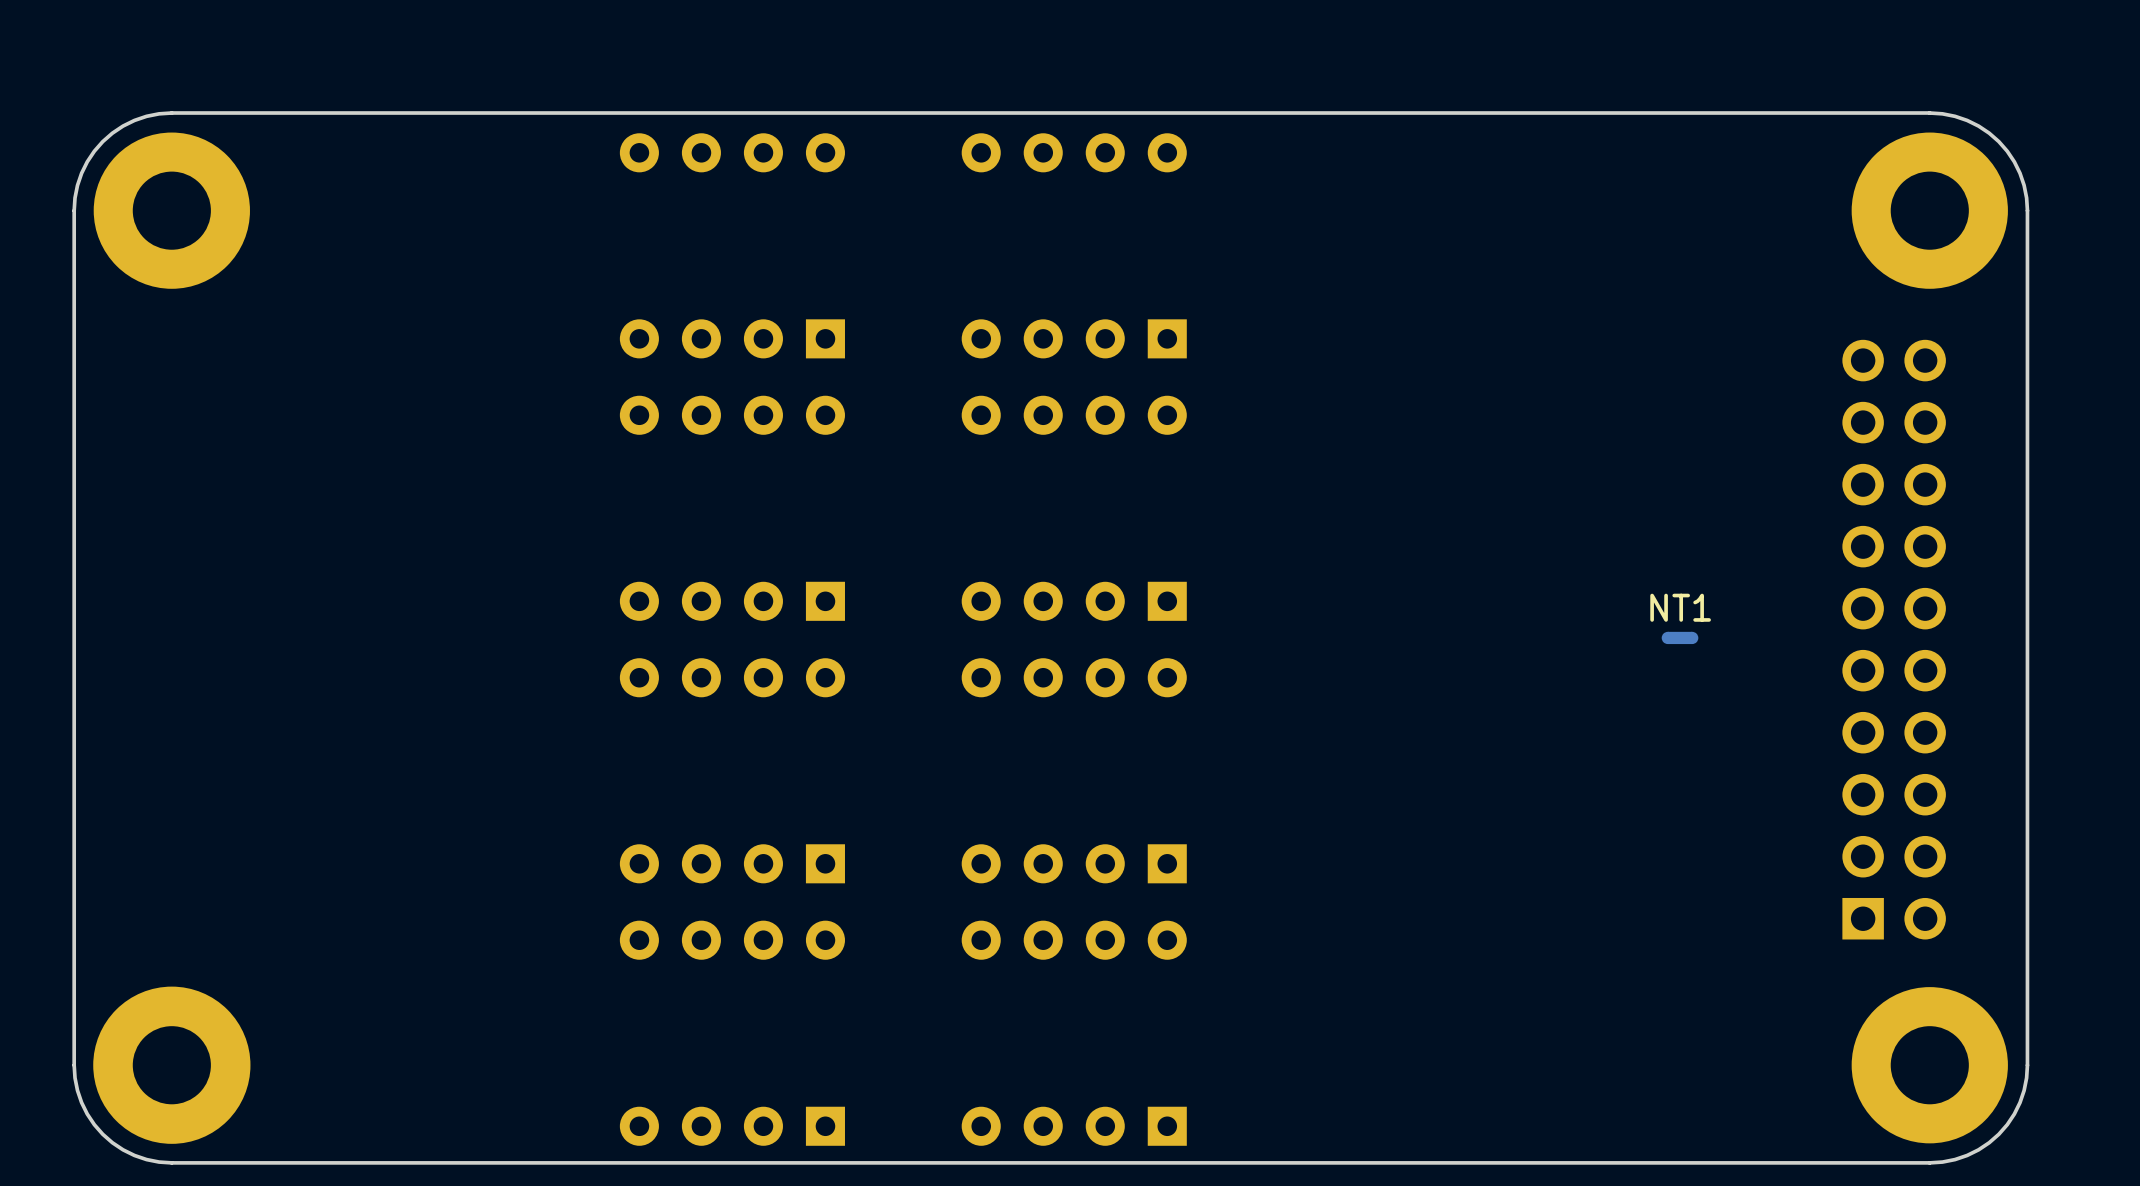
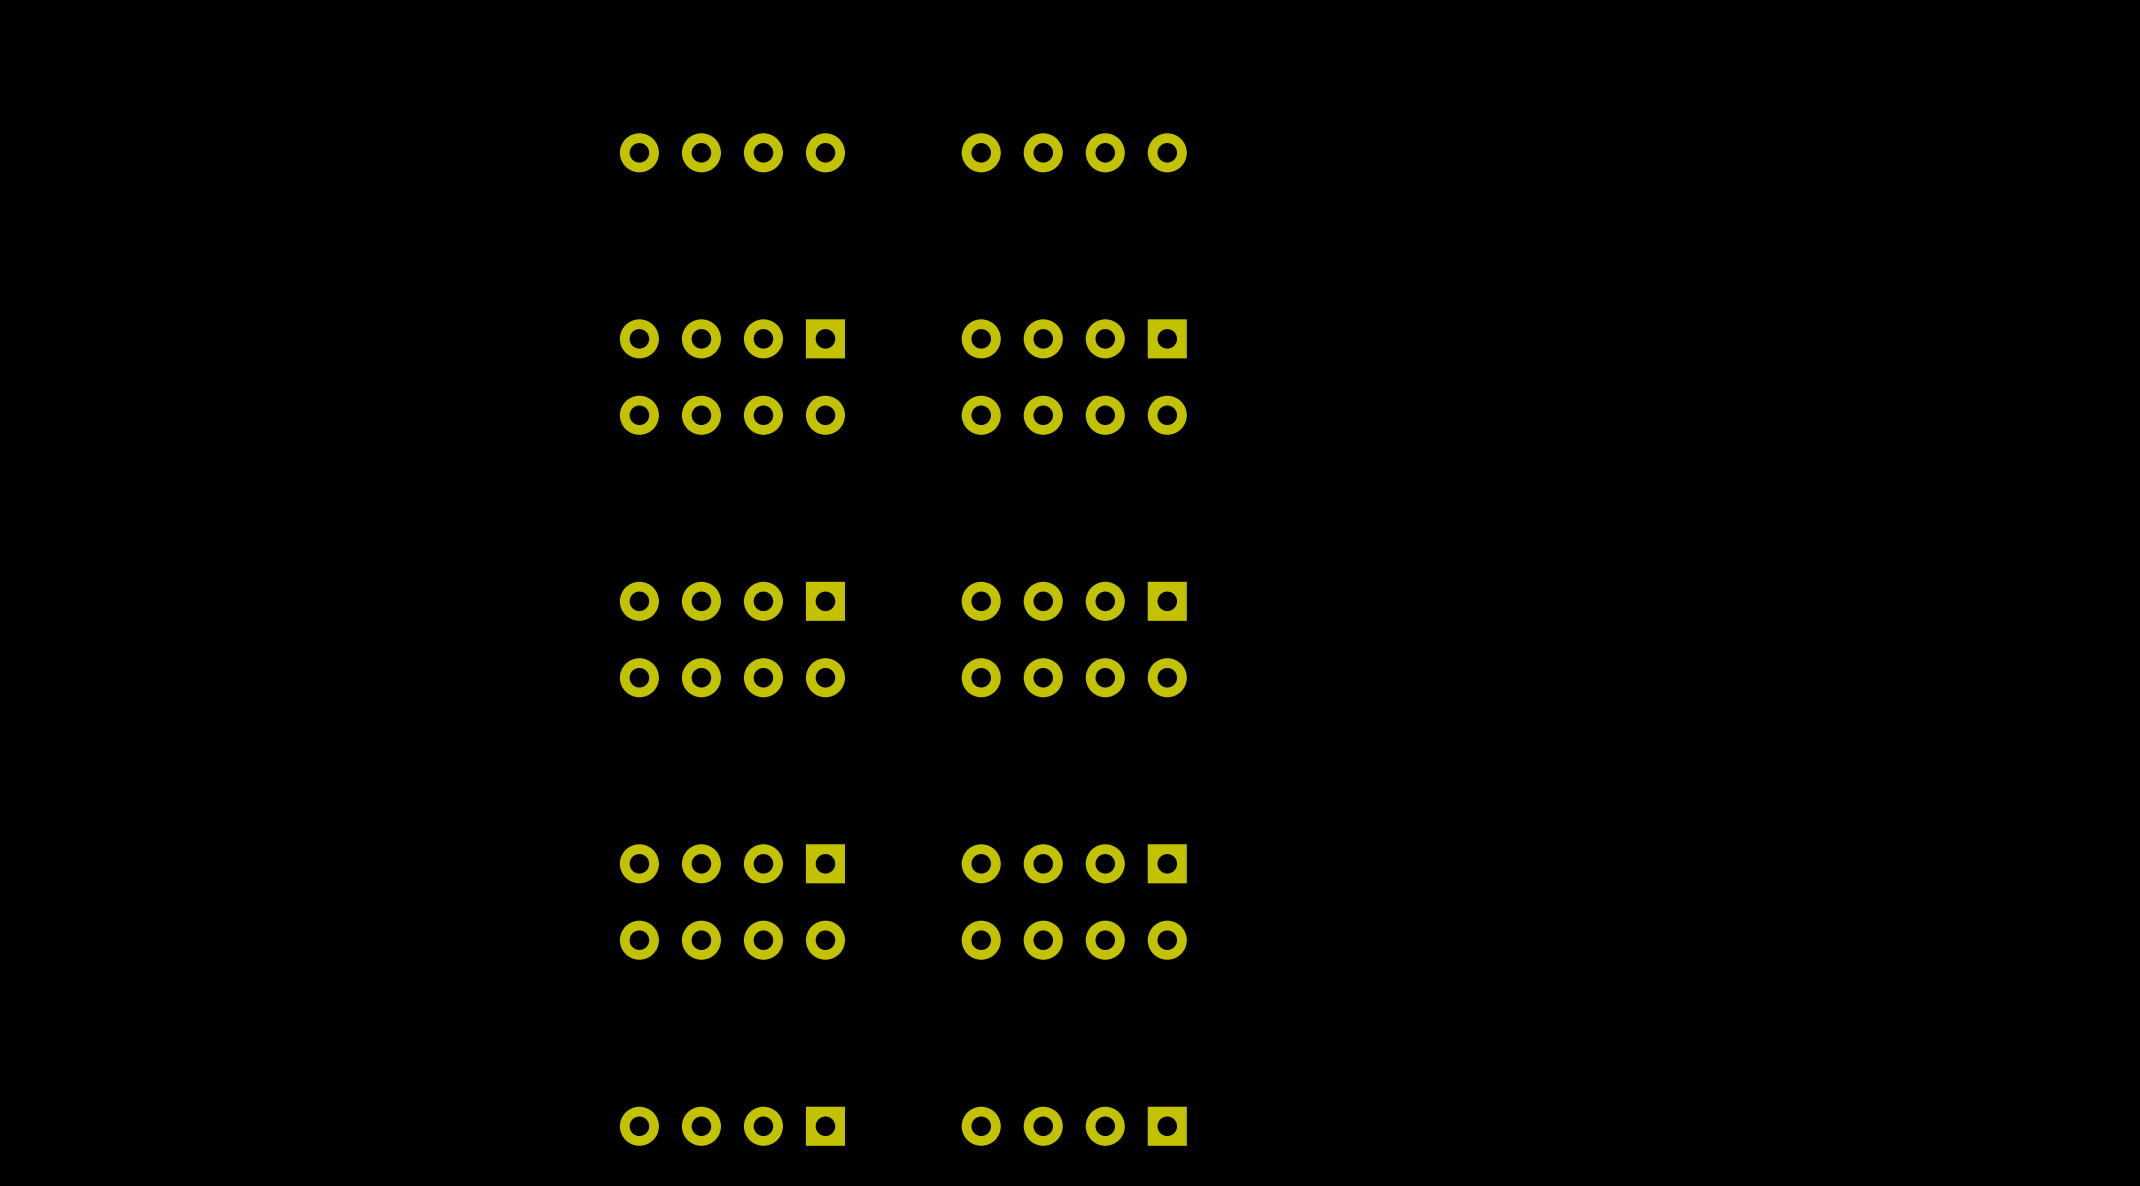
part: (1050, 637) -> none
NT1: (1680, 637) -> none
part: (1894, 639) -> none

